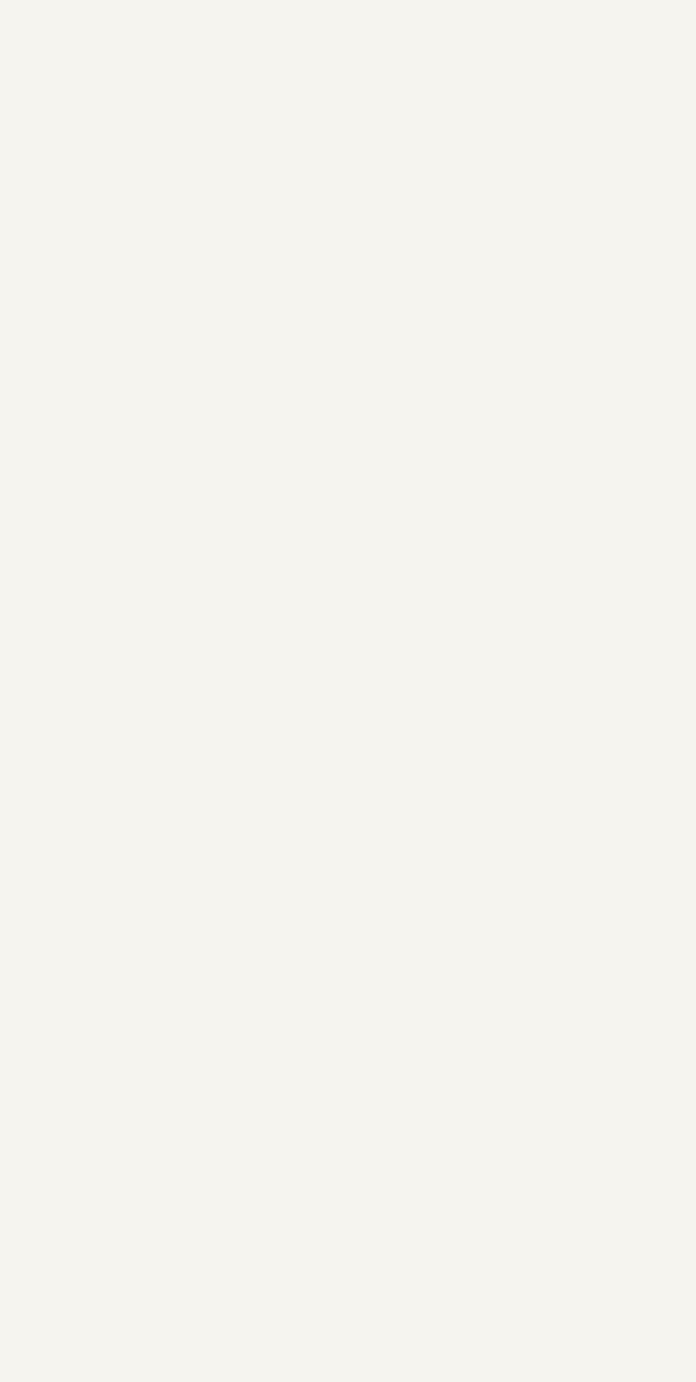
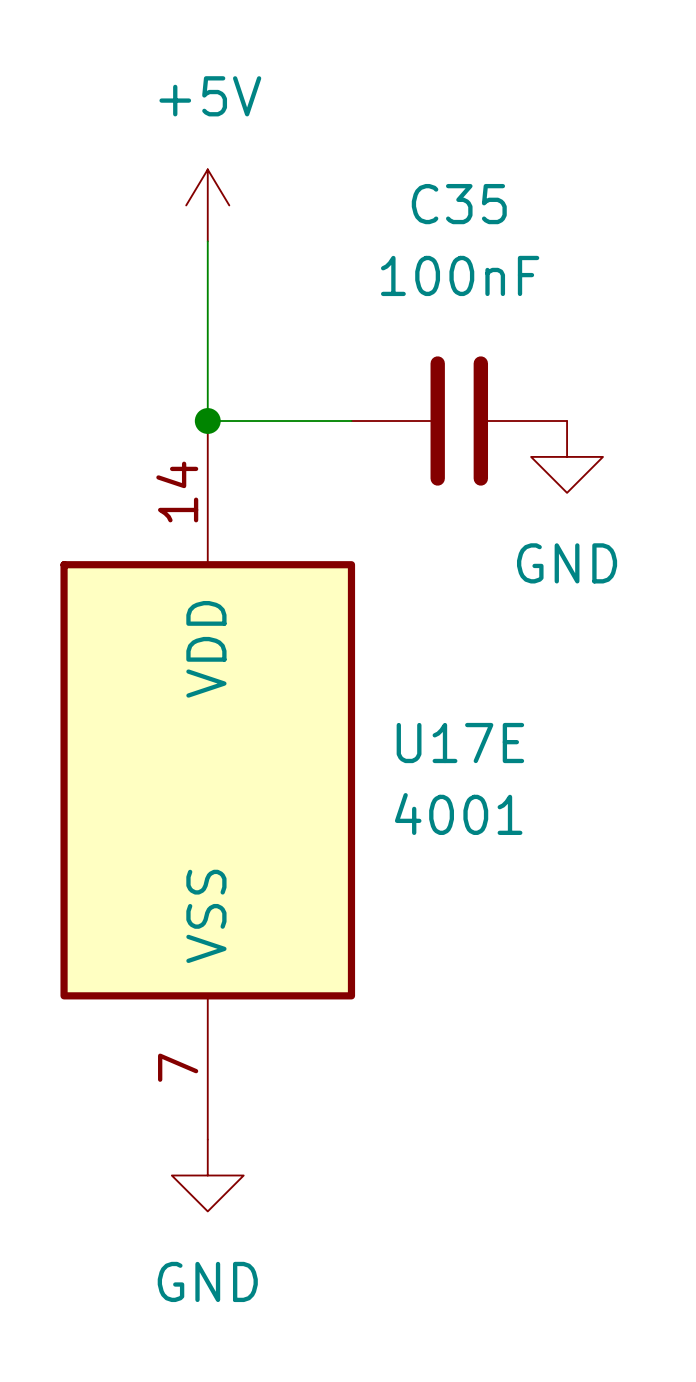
power symbol: none -> +5V (207, 205)
wire: none -> (207, 241) (207, 421) (351, 421)
junction: none -> (207, 421)
C35: none -> 100nF (459, 421)
power symbol: none -> GND (567, 456)
U17E: none -> 4001 (207, 780)
power symbol: none -> GND (207, 1175)

